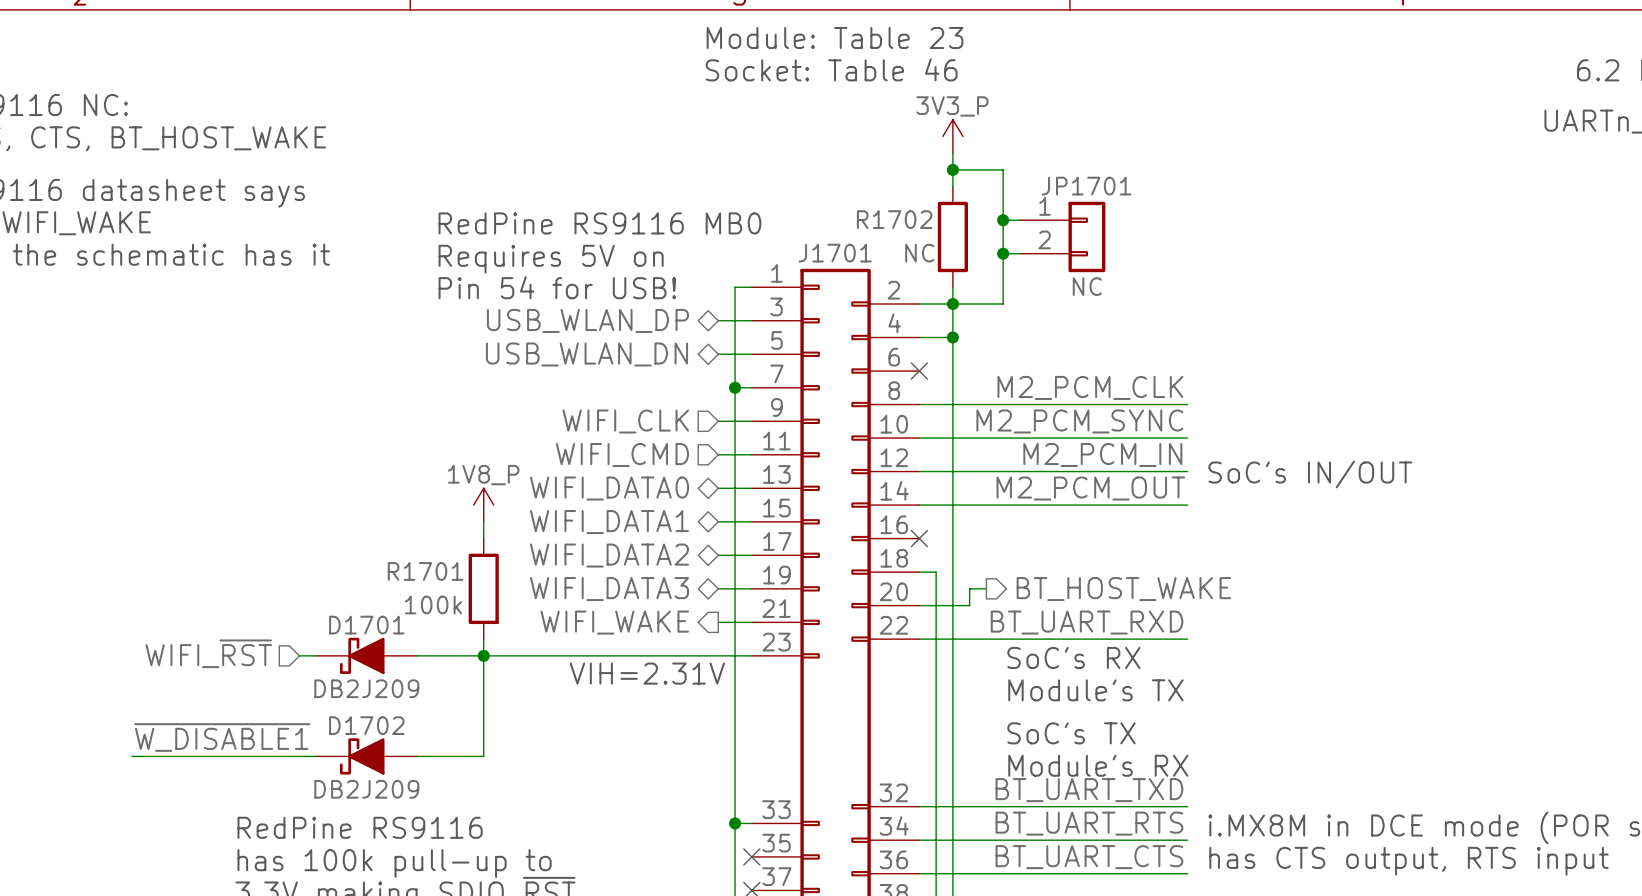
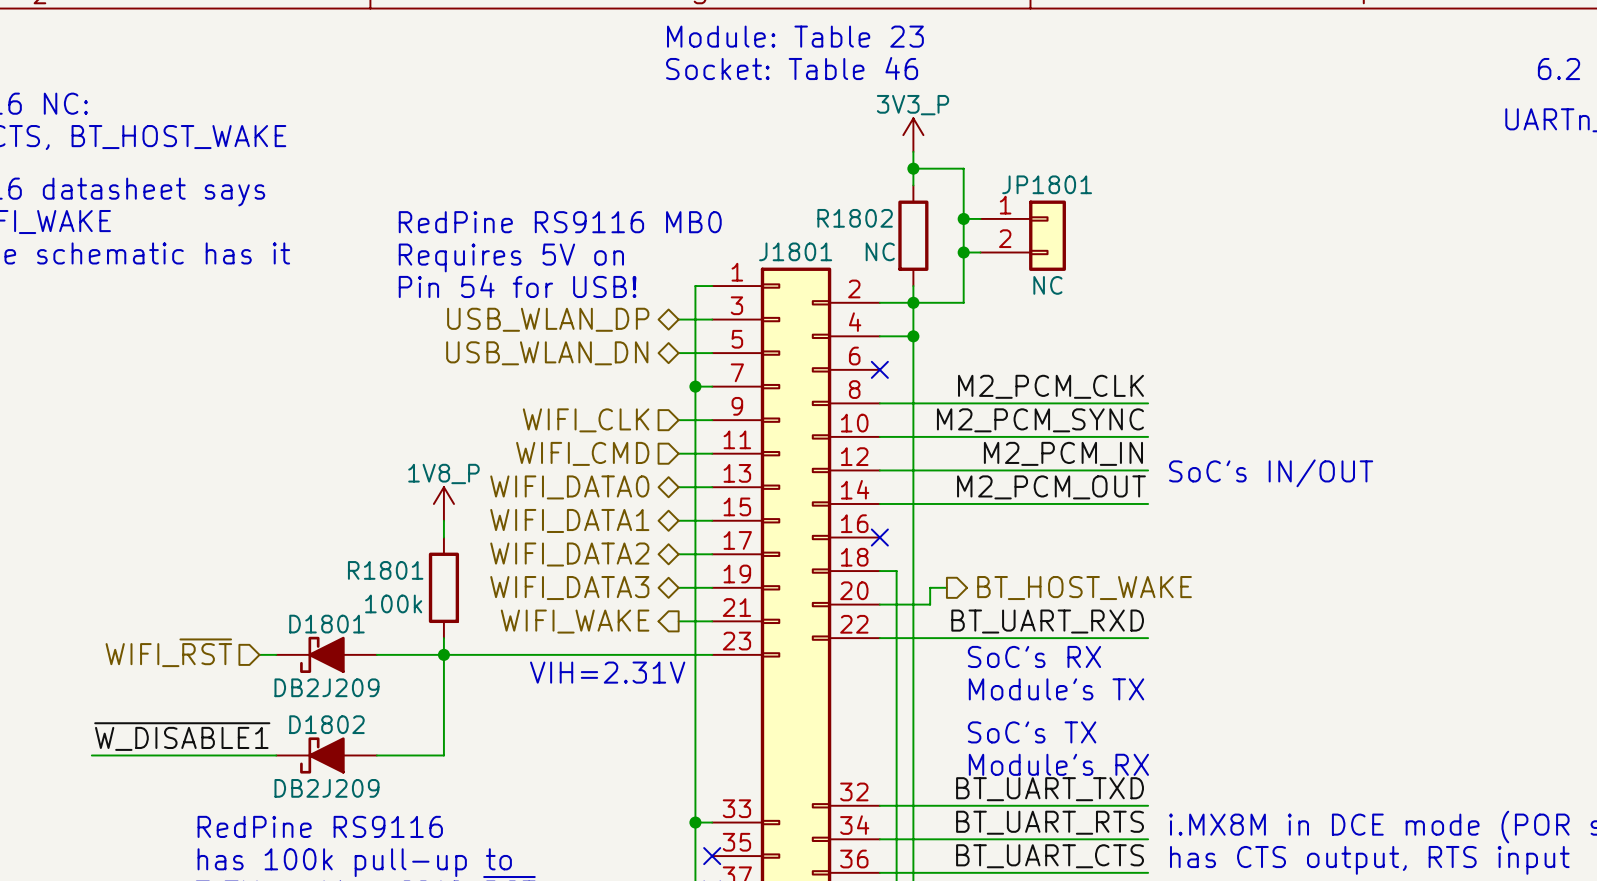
JP1701 name: JP1701 (1086, 186) -> JP1801 (1047, 184)
R1702 name: R1702 (894, 219) -> R1802 (855, 218)
J1701 name: J1701 (835, 253) -> J1801 (795, 251)
R1701 name: R1701 (425, 571) -> R1801 (385, 570)
D1701 name: D1701 (366, 625) -> D1801 (326, 624)
D1702 name: D1702 (366, 725) -> D1802 (326, 724)

